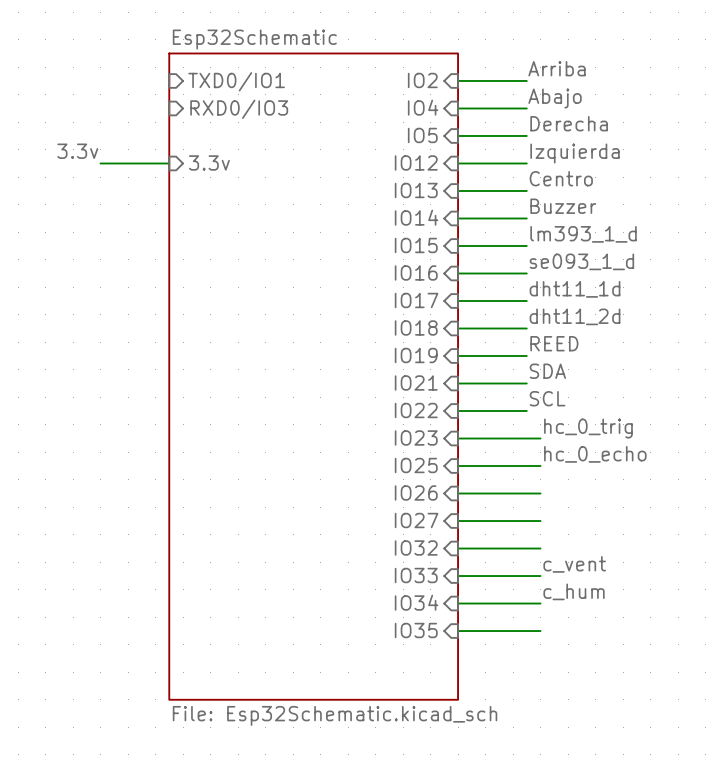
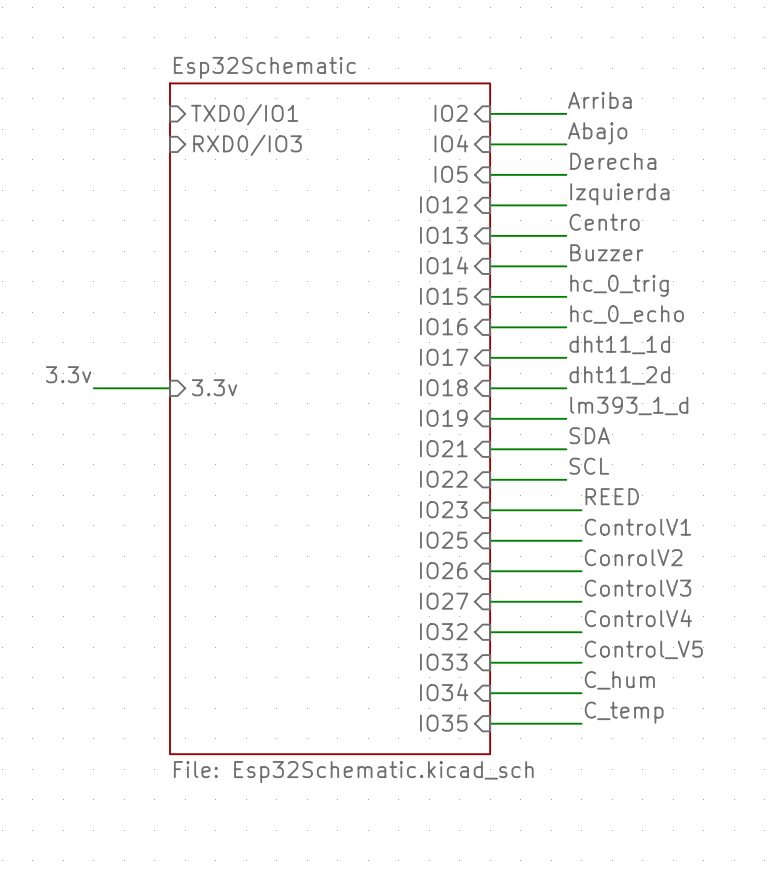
sheet Esp32Schematic shape: [168, 52, 459, 701] -> [169, 82, 492, 756]
label position: 3.3v (77, 151) -> 3.3v (68, 374)
sheet pin position: 3.3v (209, 162) -> 3.3v (214, 387)
wire: (100, 163) (169, 163) -> (93, 388) (169, 388)
label: lm393_1_d (583, 234) -> hc_0_trig (619, 285)
label: se093_1_d (581, 261) -> hc_0_echo (627, 314)
label: REED (554, 343) -> lm393_1_d (629, 405)
label: hc_0_trig (588, 428) -> REED (612, 496)
label: hc_0_echo (595, 454) -> ControlV1 (637, 527)
label: none -> ConrolV2 (633, 557)
label: none -> ControlV3 (637, 588)
label: none -> ControlV4 (638, 618)
label: c_vent (574, 564) -> Control_V5 (643, 649)
label: c_hum (574, 591) -> C_hum (619, 680)
label: none -> C_temp (624, 712)

